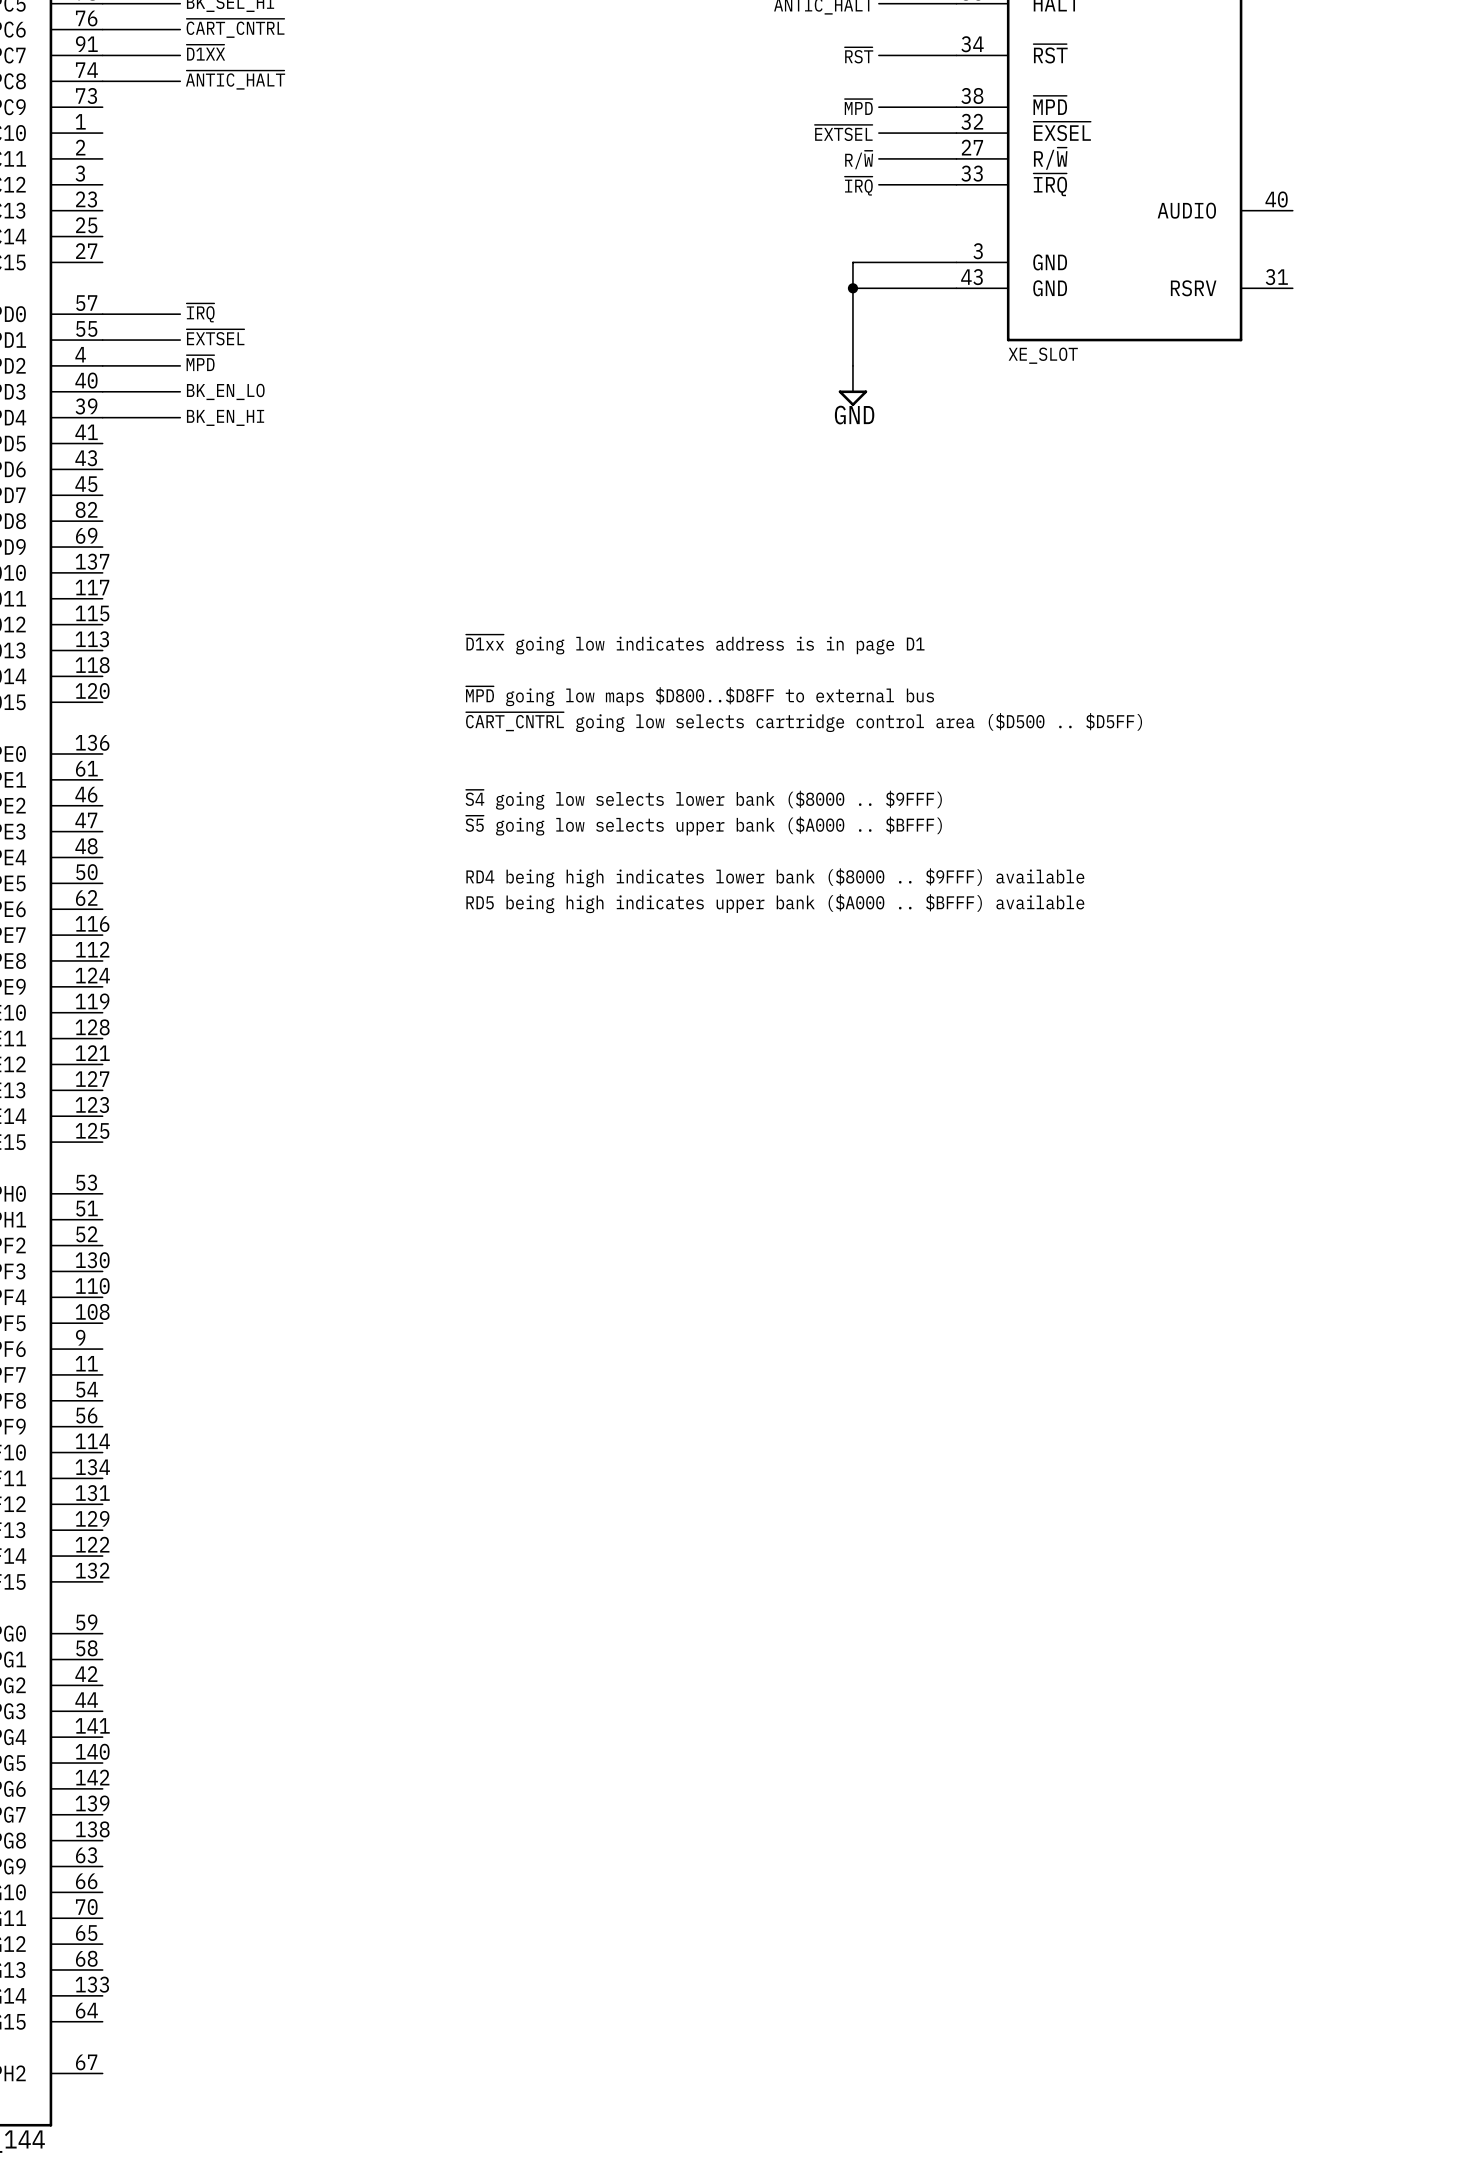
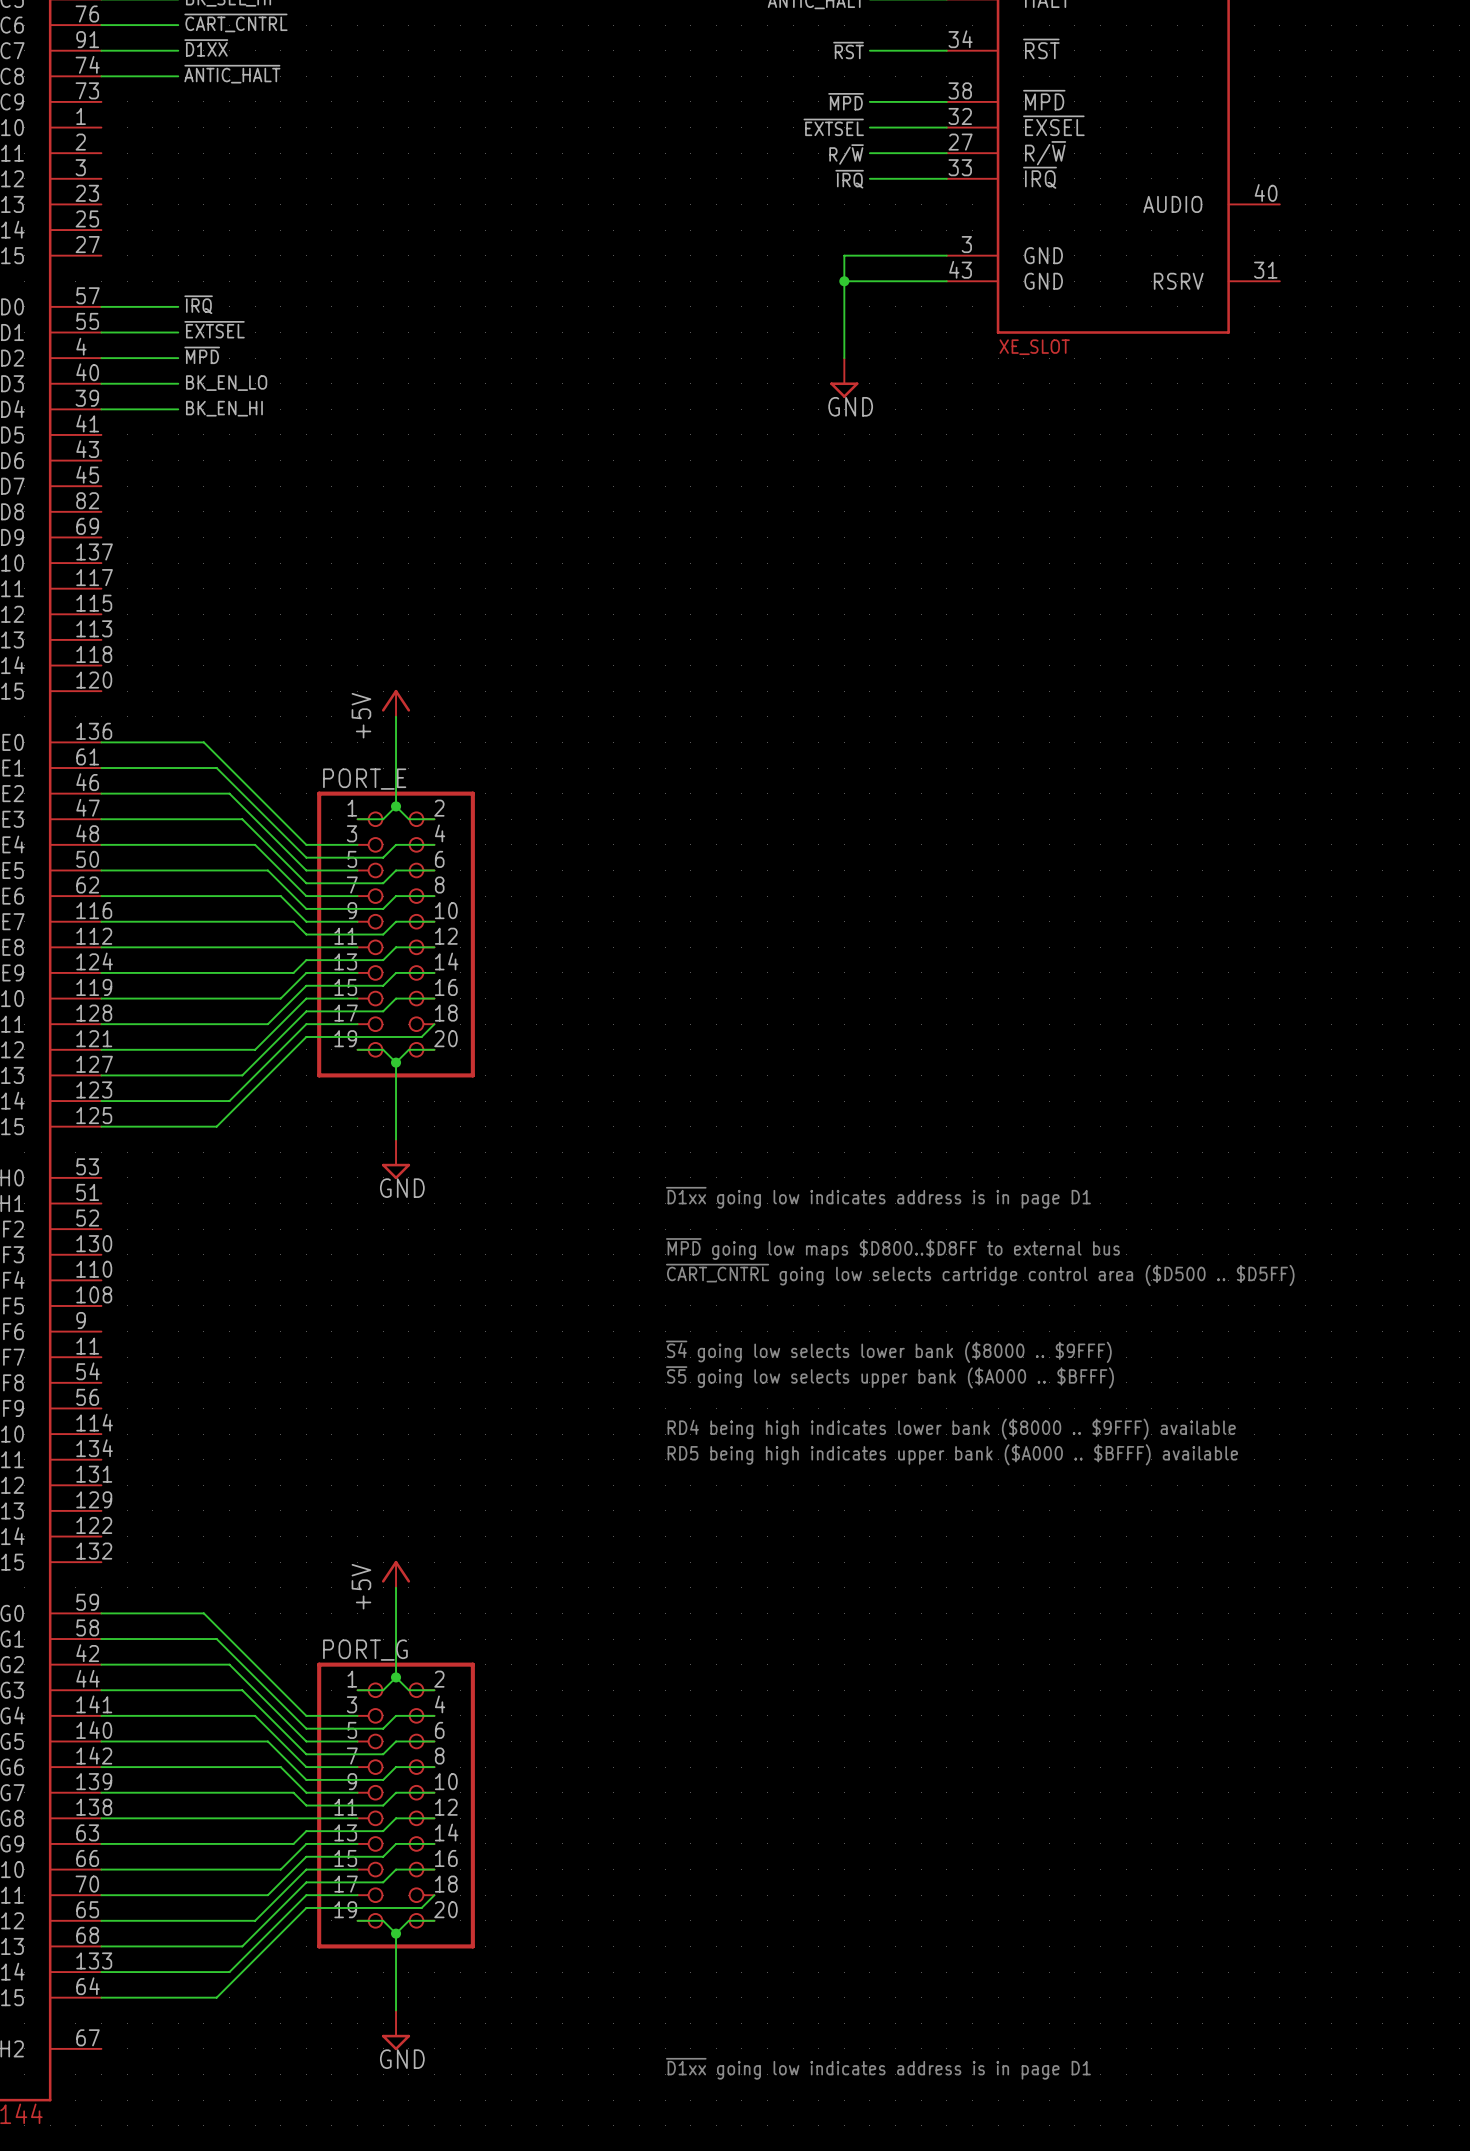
text: ~{D1xx} going low indicates address is in page D1 (695, 644) -> none
text: ~{MPD} going low maps $D800..$D8FF to external bus (700, 696) -> none
power symbol: none -> +5V (396, 703)
text: ~{CART_CNTRL} going low selects cartridge control area ($D500 .. $D5FF) (804, 722) -> none
wire: none -> (396, 716) (396, 806)
wire: none -> (101, 742) (203, 742) (306, 844) (357, 844)
wire: none -> (101, 768) (216, 768) (306, 857) (383, 857) (396, 844) (434, 844)
text: ~{S4} going low selects lower bank ($8000 .. $9FFF) (703, 799) -> none
wire: none -> (101, 793) (229, 793) (306, 870) (357, 870)
wire: none -> (396, 806) (383, 819) (357, 819)
wire: none -> (396, 806) (408, 819) (434, 819)
junction: none -> (396, 806)
text: ~{S5} going low selects upper bank ($A000 .. $BFFF) (703, 825) -> none
wire: none -> (101, 819) (242, 819) (306, 883) (383, 883) (396, 870) (434, 870)
wire: none -> (101, 844) (255, 844) (306, 896) (357, 896)
text: RD4 being high indicates lower bank ($8000 .. $9FFF) available (775, 877) -> none
wire: none -> (101, 870) (267, 870) (306, 908) (383, 908) (396, 896) (434, 896)
text: RD5 being high indicates upper bank ($A000 .. $BFFF) available (775, 903) -> none
wire: none -> (101, 896) (280, 896) (306, 921) (357, 921)
wire: none -> (101, 921) (293, 921) (306, 934) (383, 934) (396, 921) (434, 921)
PORT_E: none -> (396, 934)
wire: none -> (101, 947) (357, 947)
wire: none -> (434, 947) (396, 947) (383, 960) (306, 960) (293, 972) (101, 972)
wire: none -> (357, 972) (306, 972) (280, 998) (101, 998)
wire: none -> (434, 972) (396, 972) (383, 985) (306, 985) (267, 1024) (101, 1024)
wire: none -> (357, 998) (306, 998) (255, 1049) (101, 1049)
wire: none -> (434, 998) (396, 998) (383, 1011) (306, 1011) (242, 1075) (101, 1075)
wire: none -> (357, 1024) (306, 1024) (229, 1101) (101, 1101)
wire: none -> (434, 1024) (421, 1036) (306, 1036) (216, 1126) (101, 1126)
wire: none -> (357, 1049) (383, 1049) (396, 1062)
wire: none -> (434, 1049) (408, 1049) (396, 1062)
wire: none -> (396, 1062) (396, 1139)
junction: none -> (396, 1062)
power symbol: none -> GND (396, 1159)
text: none -> ~{D1xx} going low indicates address is in page D1 (878, 1197)
text: none -> ~{MPD} going low maps $D800..$D8FF to external bus (892, 1249)
text: none -> ~{CART_CNTRL} going low selects cartridge control area ($D500 .. $D5FF) (980, 1274)
text: none -> ~{S4} going low selects lower bank ($8000 .. $9FFF) (888, 1351)
text: none -> ~{S5} going low selects upper bank ($A000 .. $BFFF) (889, 1377)
text: none -> RD4 being high indicates lower bank ($8000 .. $9FFF) available (951, 1429)
text: none -> RD5 being high indicates upper bank ($A000 .. $BFFF) available (952, 1454)
power symbol: none -> +5V (396, 1574)
wire: none -> (396, 1587) (396, 1677)
wire: none -> (101, 1613) (203, 1613) (306, 1715) (357, 1715)
wire: none -> (101, 1639) (216, 1639) (306, 1728) (383, 1728) (396, 1715) (434, 1715)
wire: none -> (101, 1664) (229, 1664) (306, 1741) (357, 1741)
wire: none -> (396, 1677) (383, 1690) (357, 1690)
wire: none -> (396, 1677) (408, 1690) (434, 1690)
junction: none -> (396, 1677)
wire: none -> (101, 1690) (242, 1690) (306, 1754) (383, 1754) (396, 1741) (434, 1741)
wire: none -> (101, 1715) (255, 1715) (306, 1767) (357, 1767)
wire: none -> (101, 1741) (267, 1741) (306, 1779) (383, 1779) (396, 1767) (434, 1767)
wire: none -> (101, 1767) (280, 1767) (306, 1792) (357, 1792)
wire: none -> (101, 1792) (293, 1792) (306, 1805) (383, 1805) (396, 1792) (434, 1792)
PORT_G: none -> (396, 1805)
wire: none -> (101, 1818) (357, 1818)
wire: none -> (434, 1818) (396, 1818) (383, 1831) (306, 1831) (293, 1843) (101, 1843)
wire: none -> (357, 1843) (306, 1843) (280, 1869) (101, 1869)
wire: none -> (434, 1843) (396, 1843) (383, 1856) (306, 1856) (267, 1895) (101, 1895)
wire: none -> (357, 1869) (306, 1869) (255, 1920) (101, 1920)
wire: none -> (434, 1869) (396, 1869) (383, 1882) (306, 1882) (242, 1946) (101, 1946)
wire: none -> (357, 1895) (306, 1895) (229, 1972) (101, 1972)
wire: none -> (434, 1895) (421, 1908) (306, 1908) (216, 1997) (101, 1997)
wire: none -> (357, 1920) (383, 1920) (396, 1933)
wire: none -> (434, 1920) (408, 1920) (396, 1933)
wire: none -> (396, 1933) (396, 2010)
junction: none -> (396, 1933)
power symbol: none -> GND (396, 2030)
text: none -> ~{D1xx} going low indicates address is in page D1 (878, 2068)

